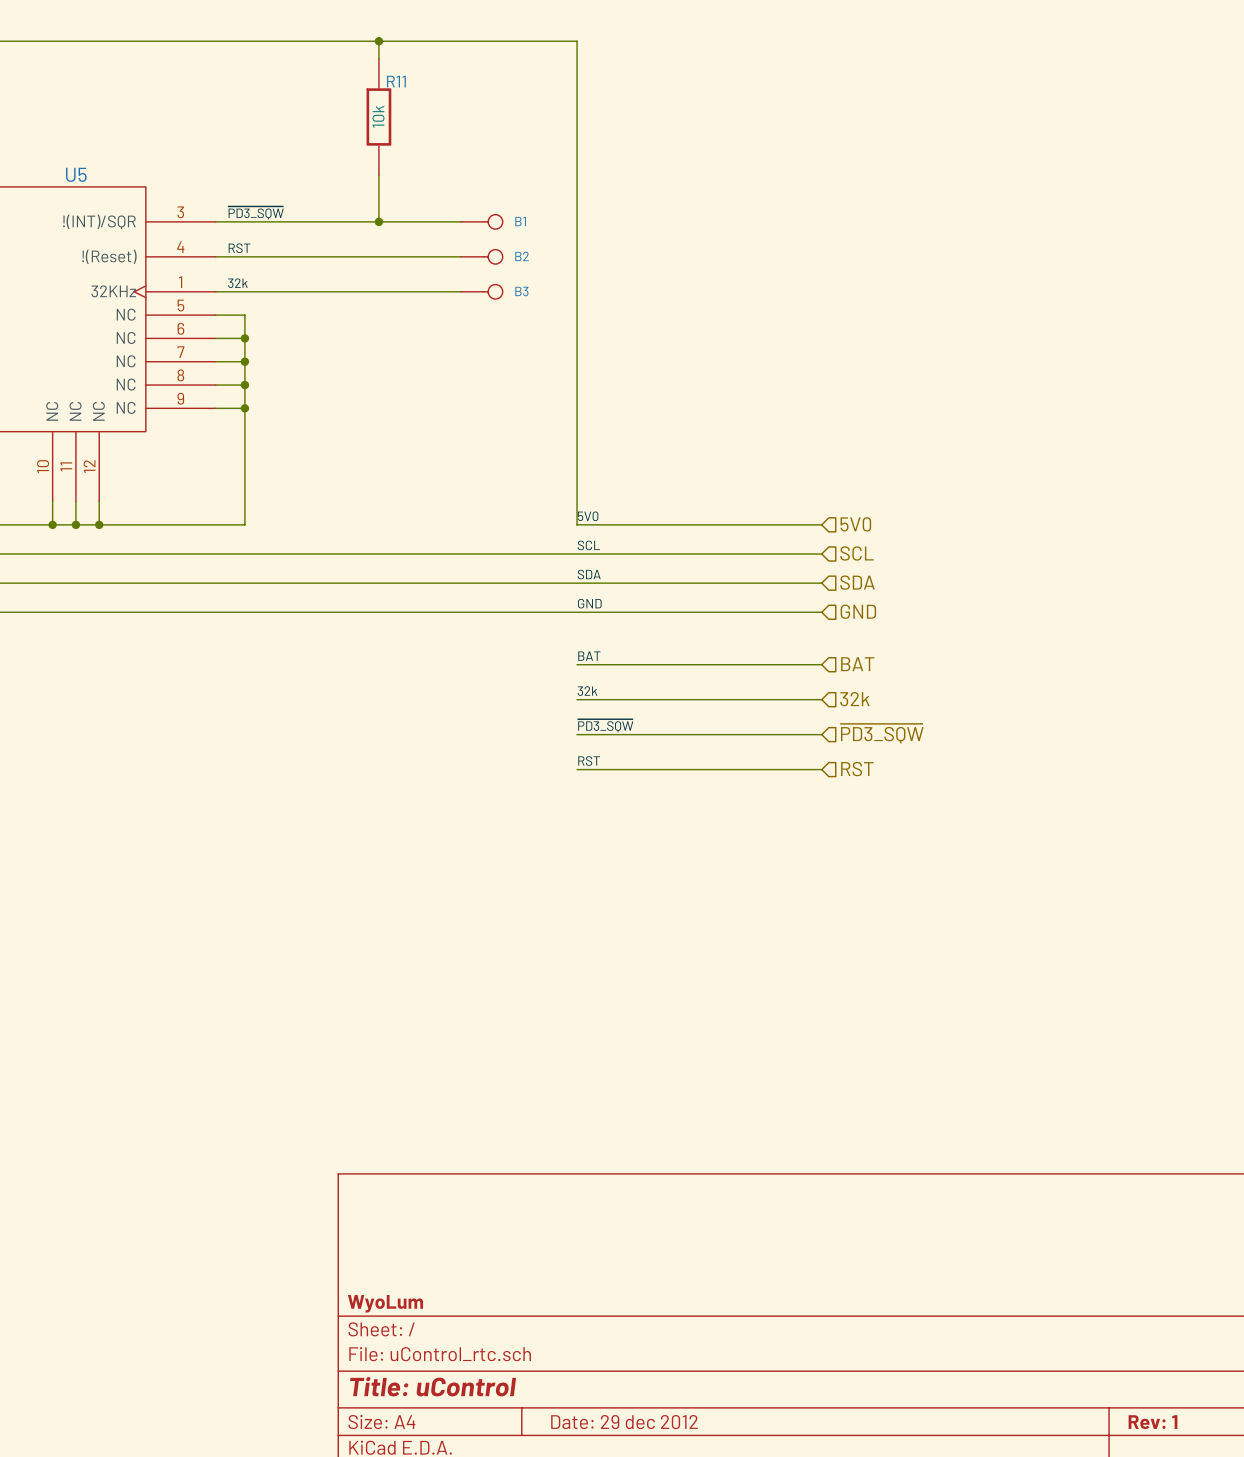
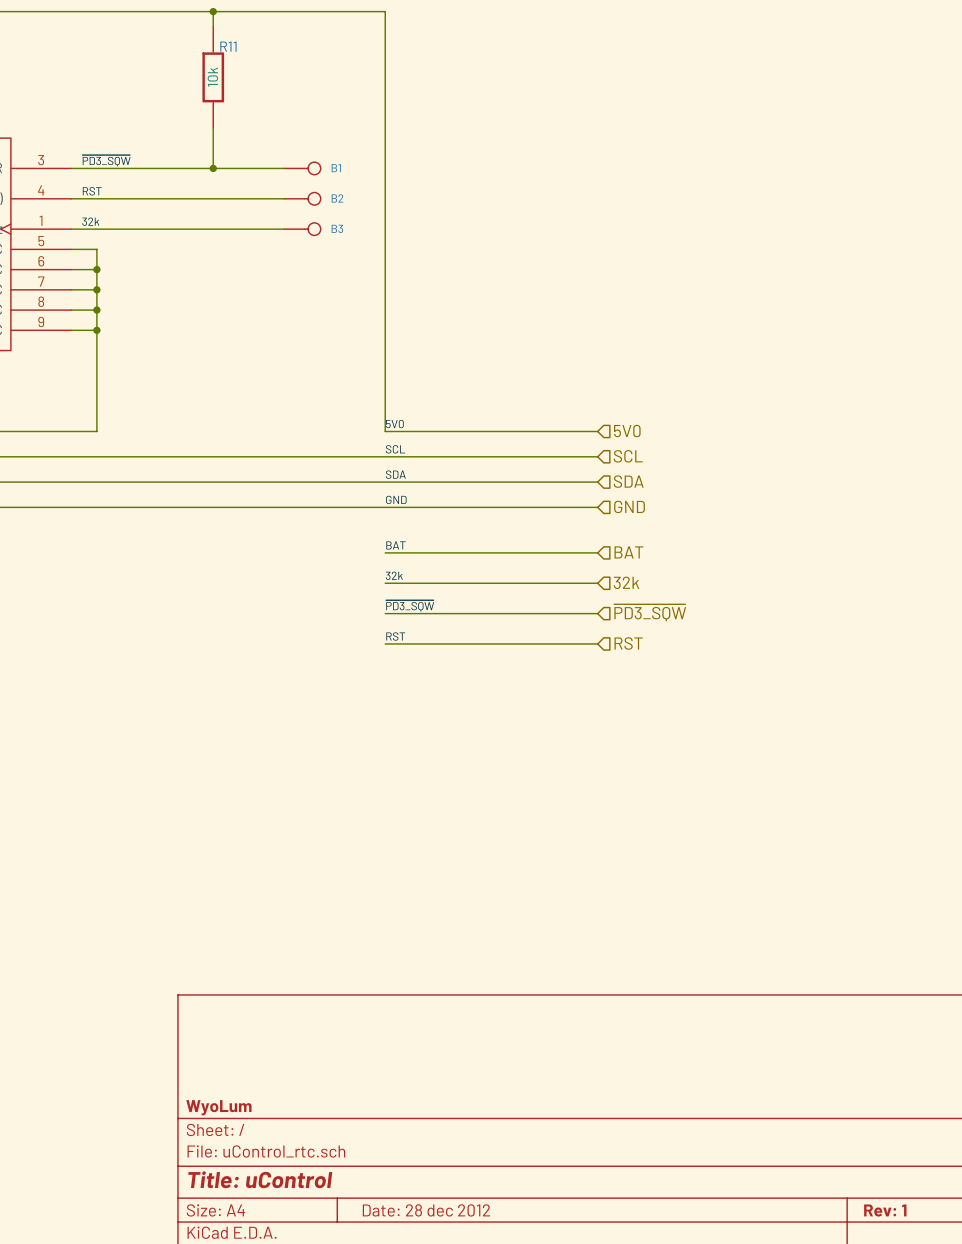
title block: Date: 29 dec 2012 (624, 1422) -> Date: 28 dec 2012 (426, 1210)

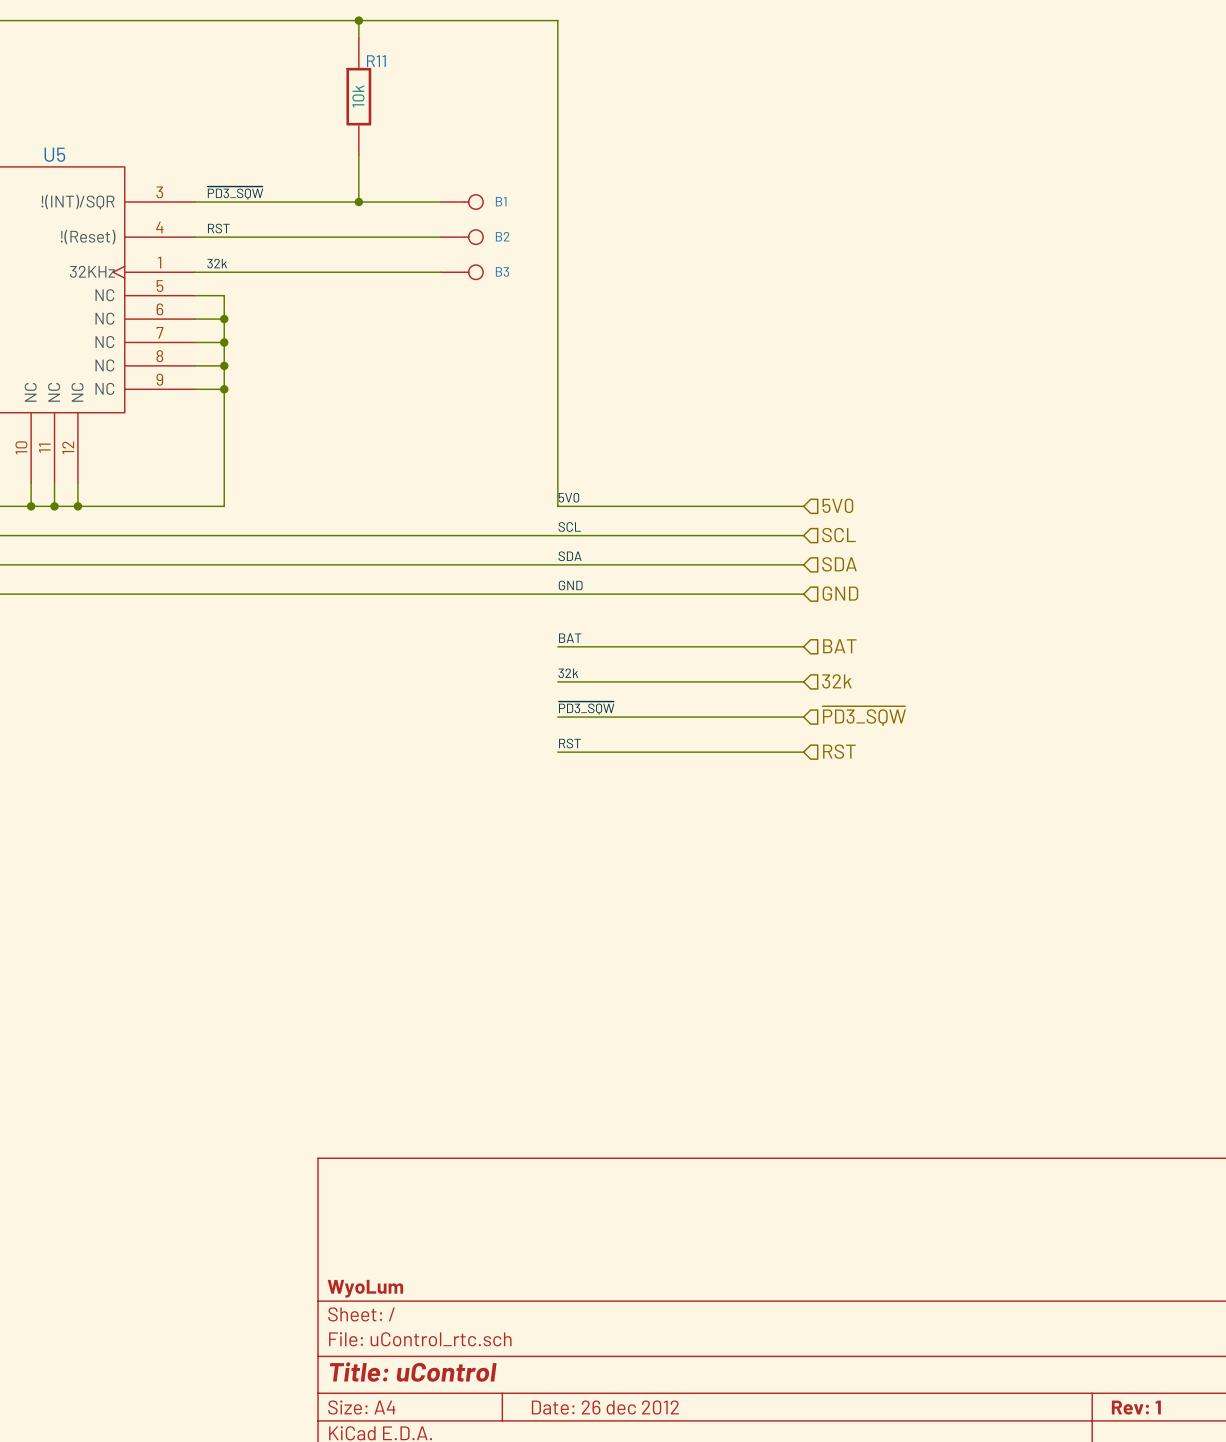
title block: Date: 28 dec 2012 (426, 1210) -> Date: 26 dec 2012 (605, 1407)

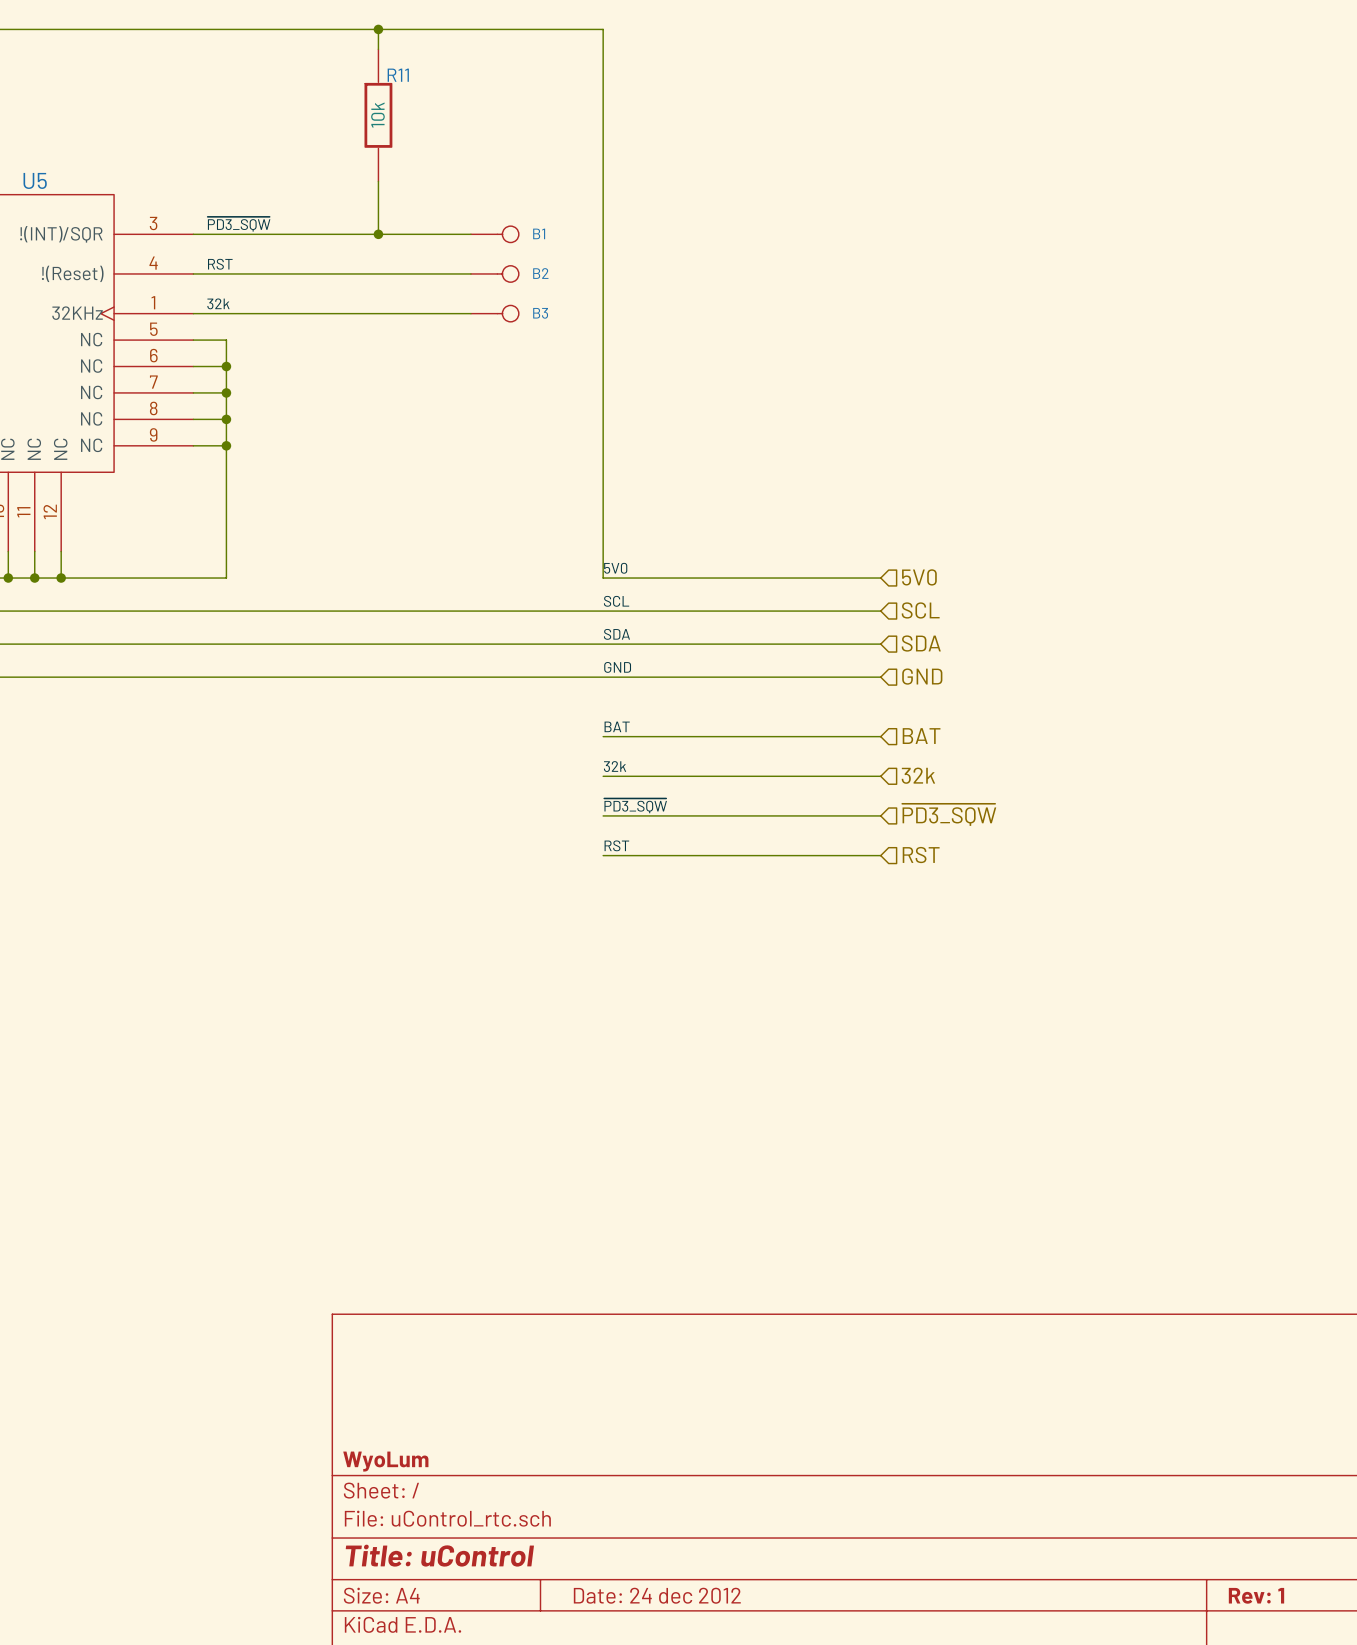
title block: Date: 26 dec 2012 (605, 1407) -> Date: 24 dec 2012 (657, 1595)

